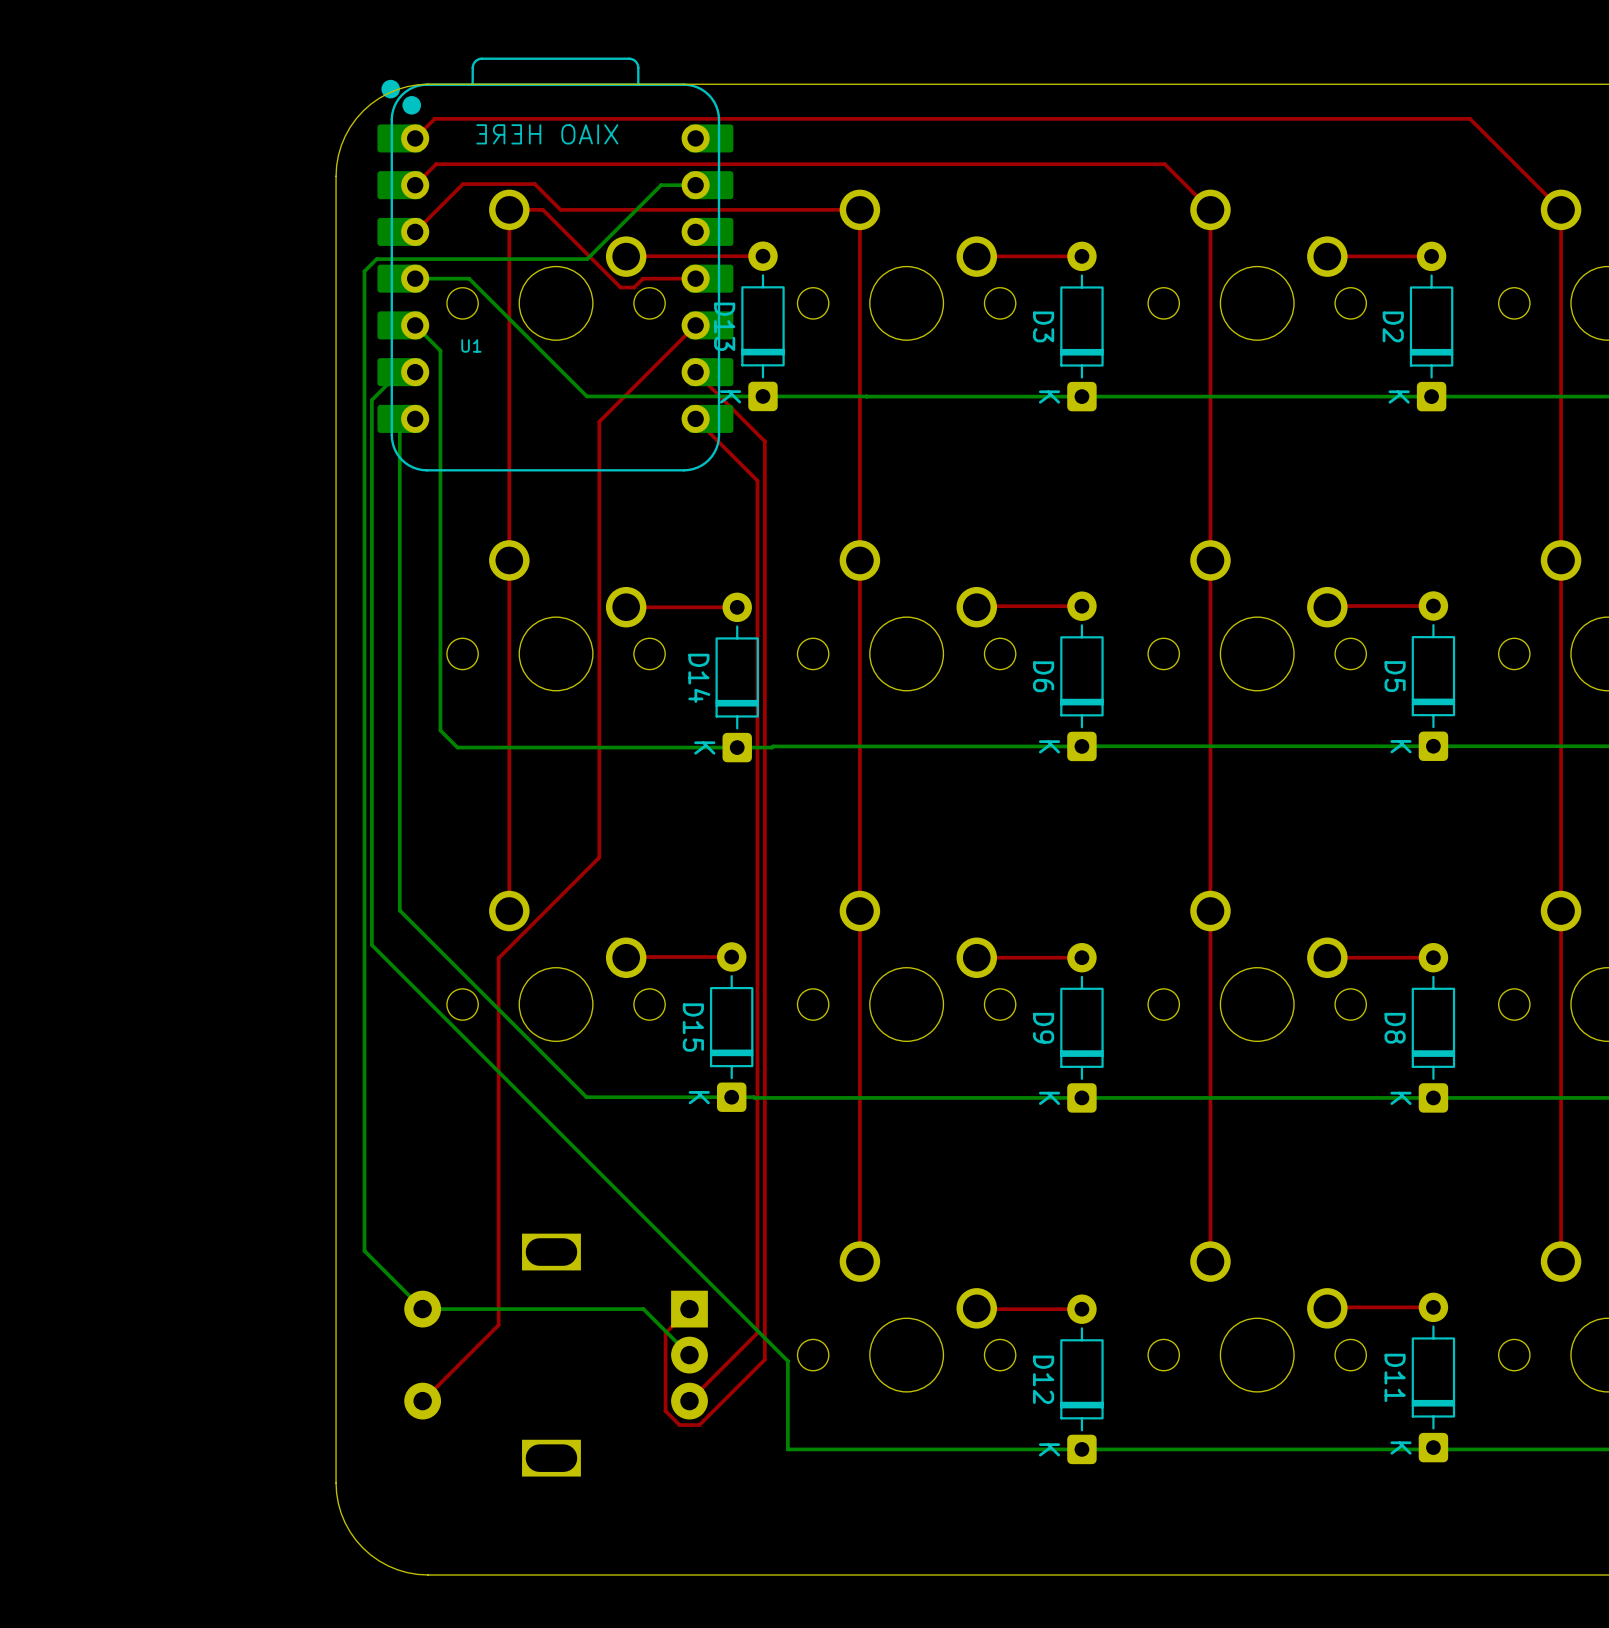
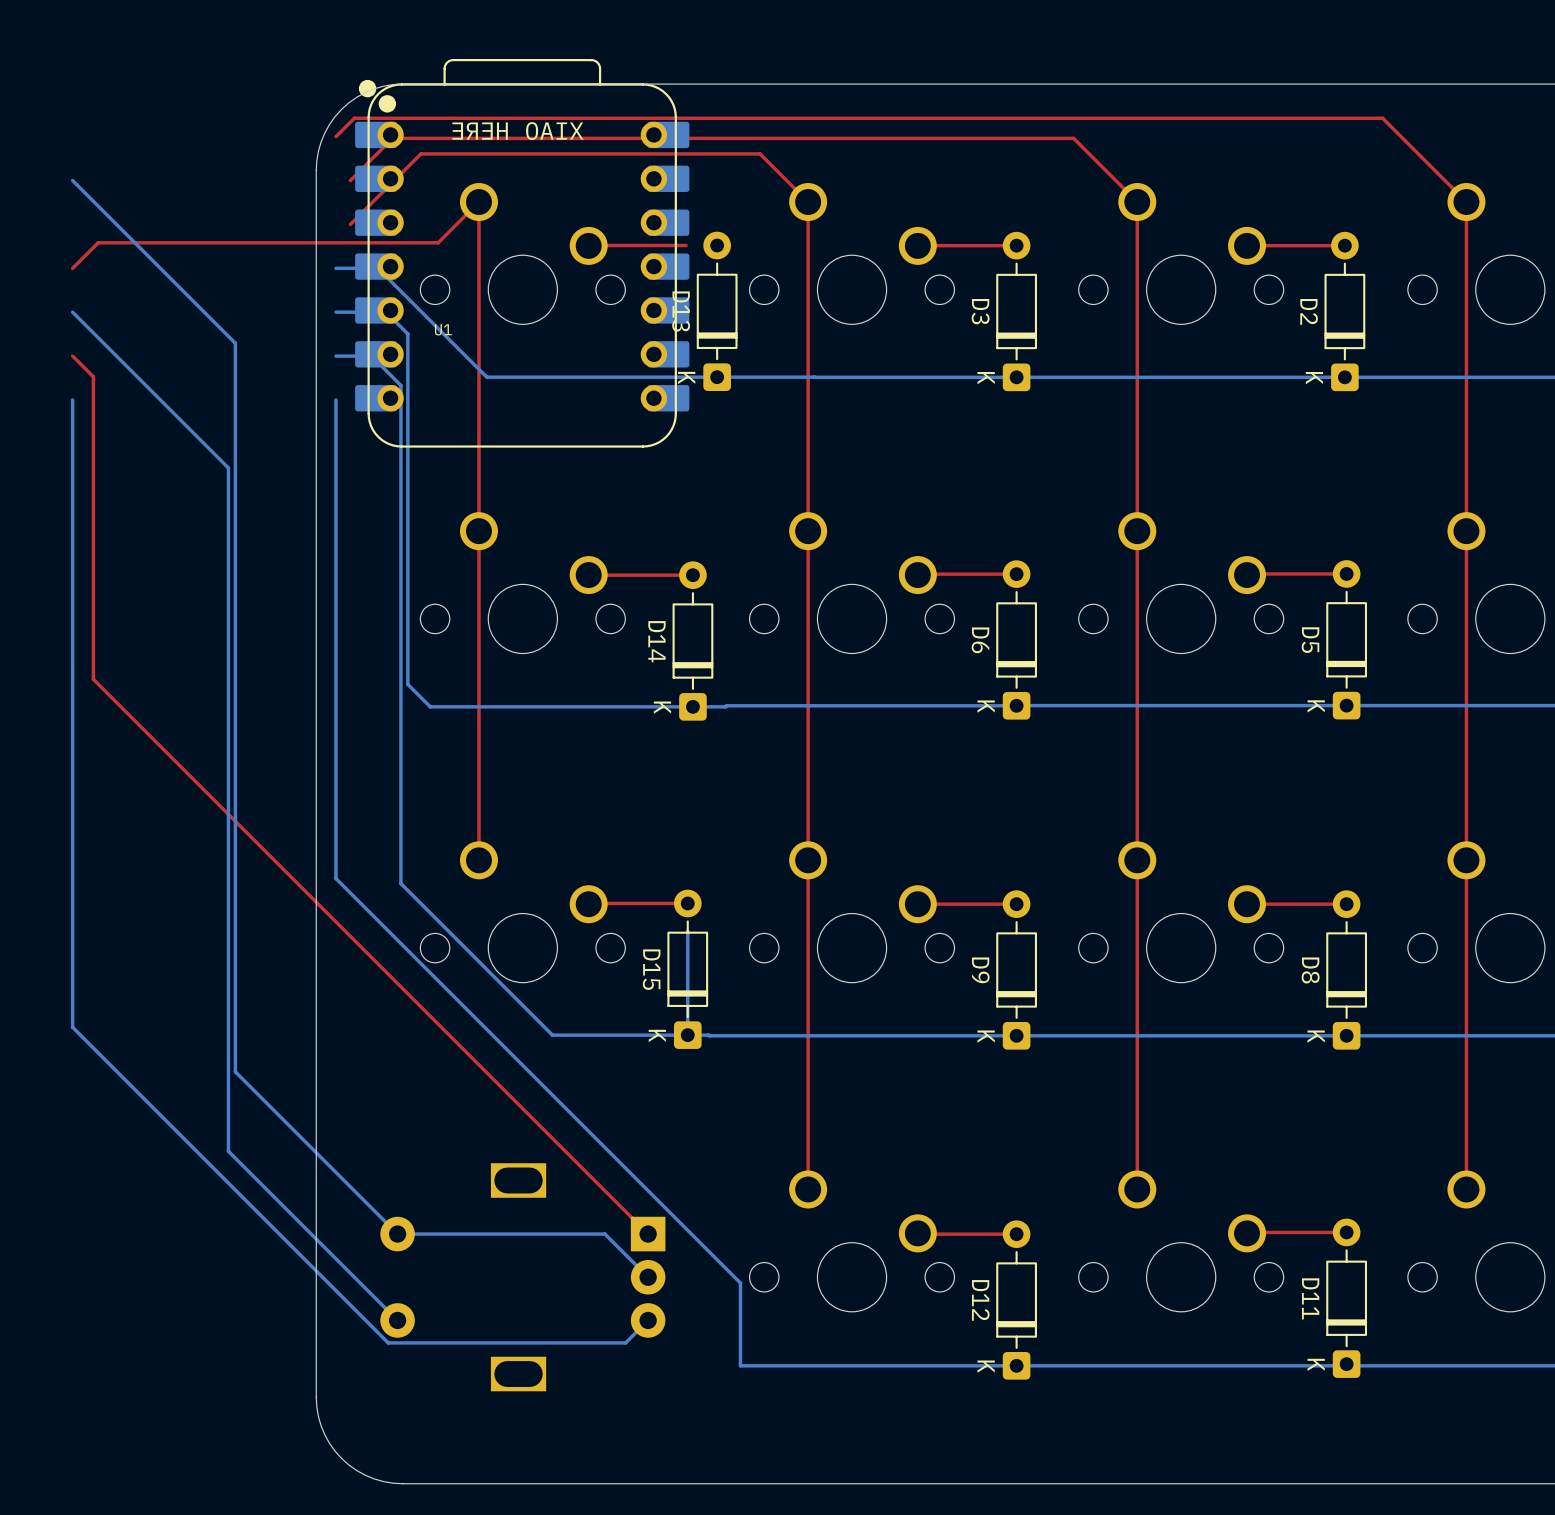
top track: (1471, 120) (1470, 118) (434, 118) (415, 138) -> (1382, 118) (354, 118) (335, 136)
top track: (1164, 164) (436, 164) (415, 185) -> (1094, 159) (1073, 138) (392, 138) (350, 180)
bottom track: (695, 185) (661, 185) (587, 259) (376, 259) (364, 271) (364, 1250) -> (72, 180) (235, 343) (235, 1071) (343, 1179)
top track: (509, 209) (542, 209) (620, 287) (634, 287) (643, 278) (695, 278) -> (478, 202) (438, 242) (98, 242) (72, 268)
top track: (859, 209) (560, 209) (534, 184) (462, 184) (415, 231) -> (808, 202) (760, 153) (420, 153) (350, 224)
top track: (762, 256) (729, 256) -> none
bottom track: (415, 278) (469, 278) (586, 396) -> (335, 268) (377, 268) (486, 377) (551, 377)
bottom track: (415, 325) (440, 350) (440, 730) -> (335, 312) (386, 312) (407, 333) (407, 684) (414, 690)
top track: (695, 325) (599, 421) (599, 857) (498, 958) (498, 1325) (422, 1401) -> none
bottom track: none -> (72, 312) (228, 468) (228, 1151) (397, 1320)
bottom track: (399, 372) (371, 400) (371, 945) (787, 1361) -> (335, 399) (335, 878) (740, 1283)
top track: (695, 372) (764, 441) (764, 1359) (699, 1425) (679, 1425) (665, 1411) (665, 1333) (689, 1309) -> (72, 356) (93, 376) (93, 679) (648, 1234)
bottom track: (399, 418) (399, 910) (587, 1097) -> (335, 356) (371, 356) (400, 385) (400, 883) (552, 1035)
top track: (695, 418) (757, 480) (757, 1333) (689, 1401) -> none
bottom track: none -> (72, 399) (72, 1027) (388, 1342) (625, 1342) (648, 1320)
bottom track: none -> (687, 930) (687, 1035)

